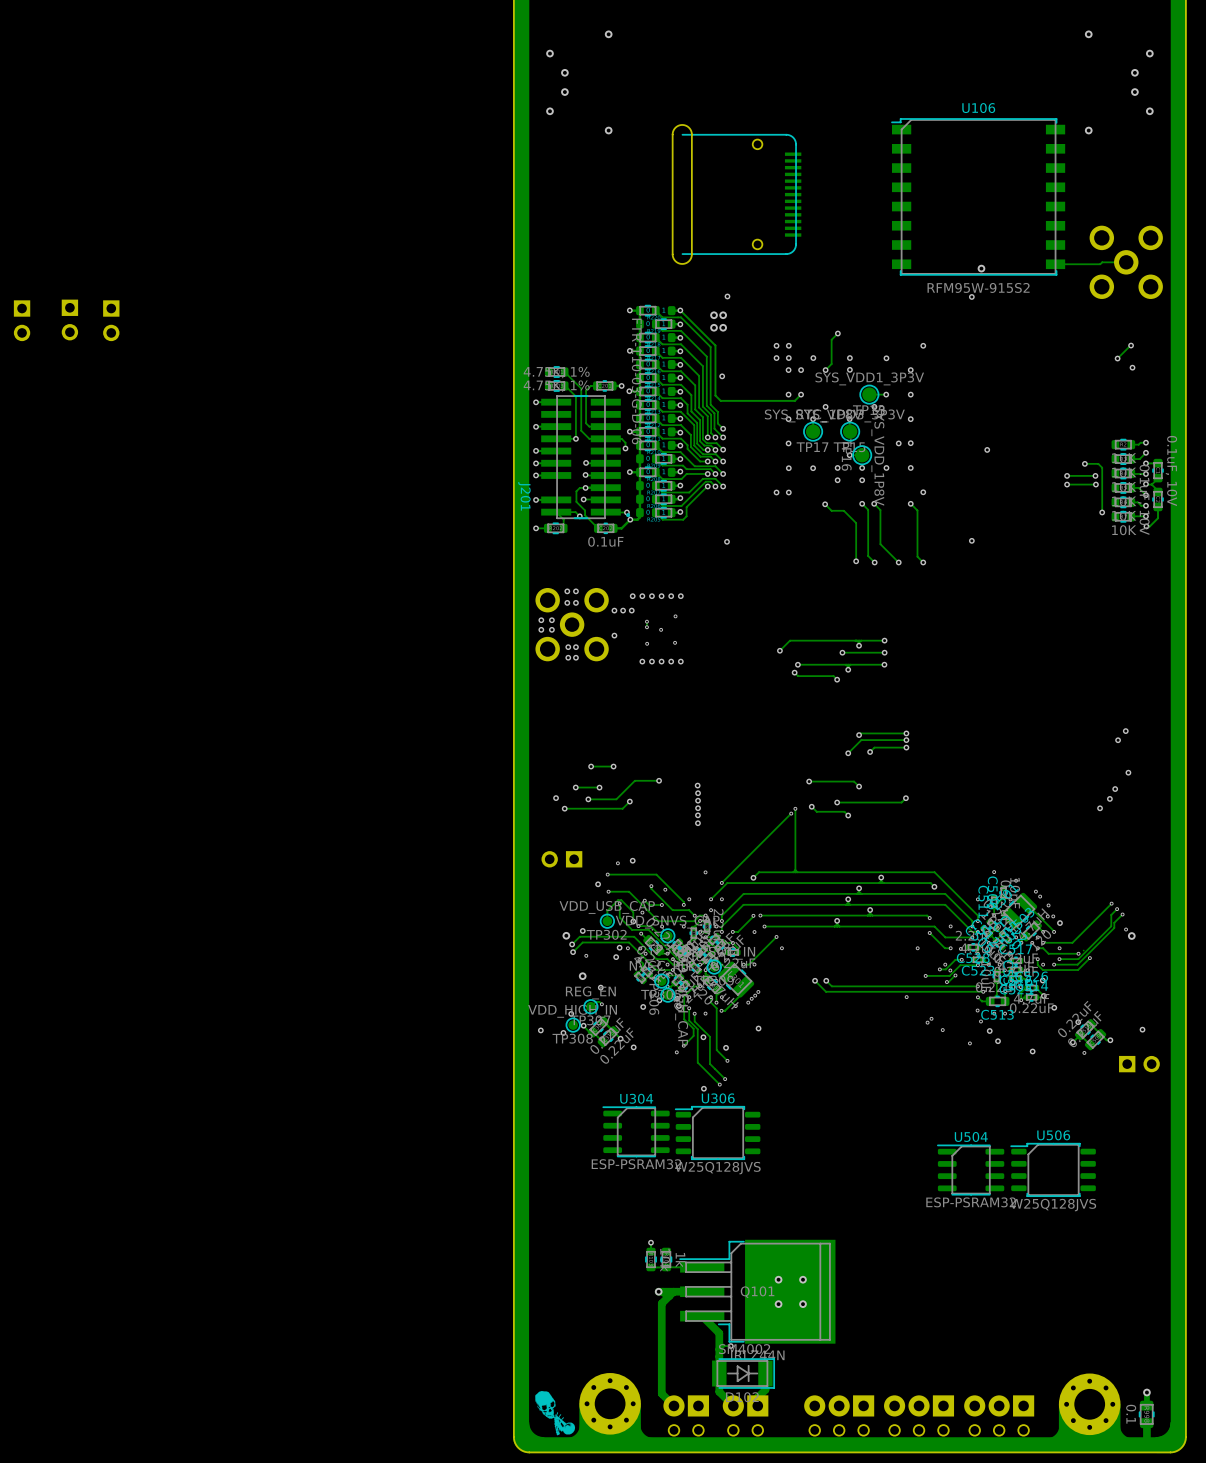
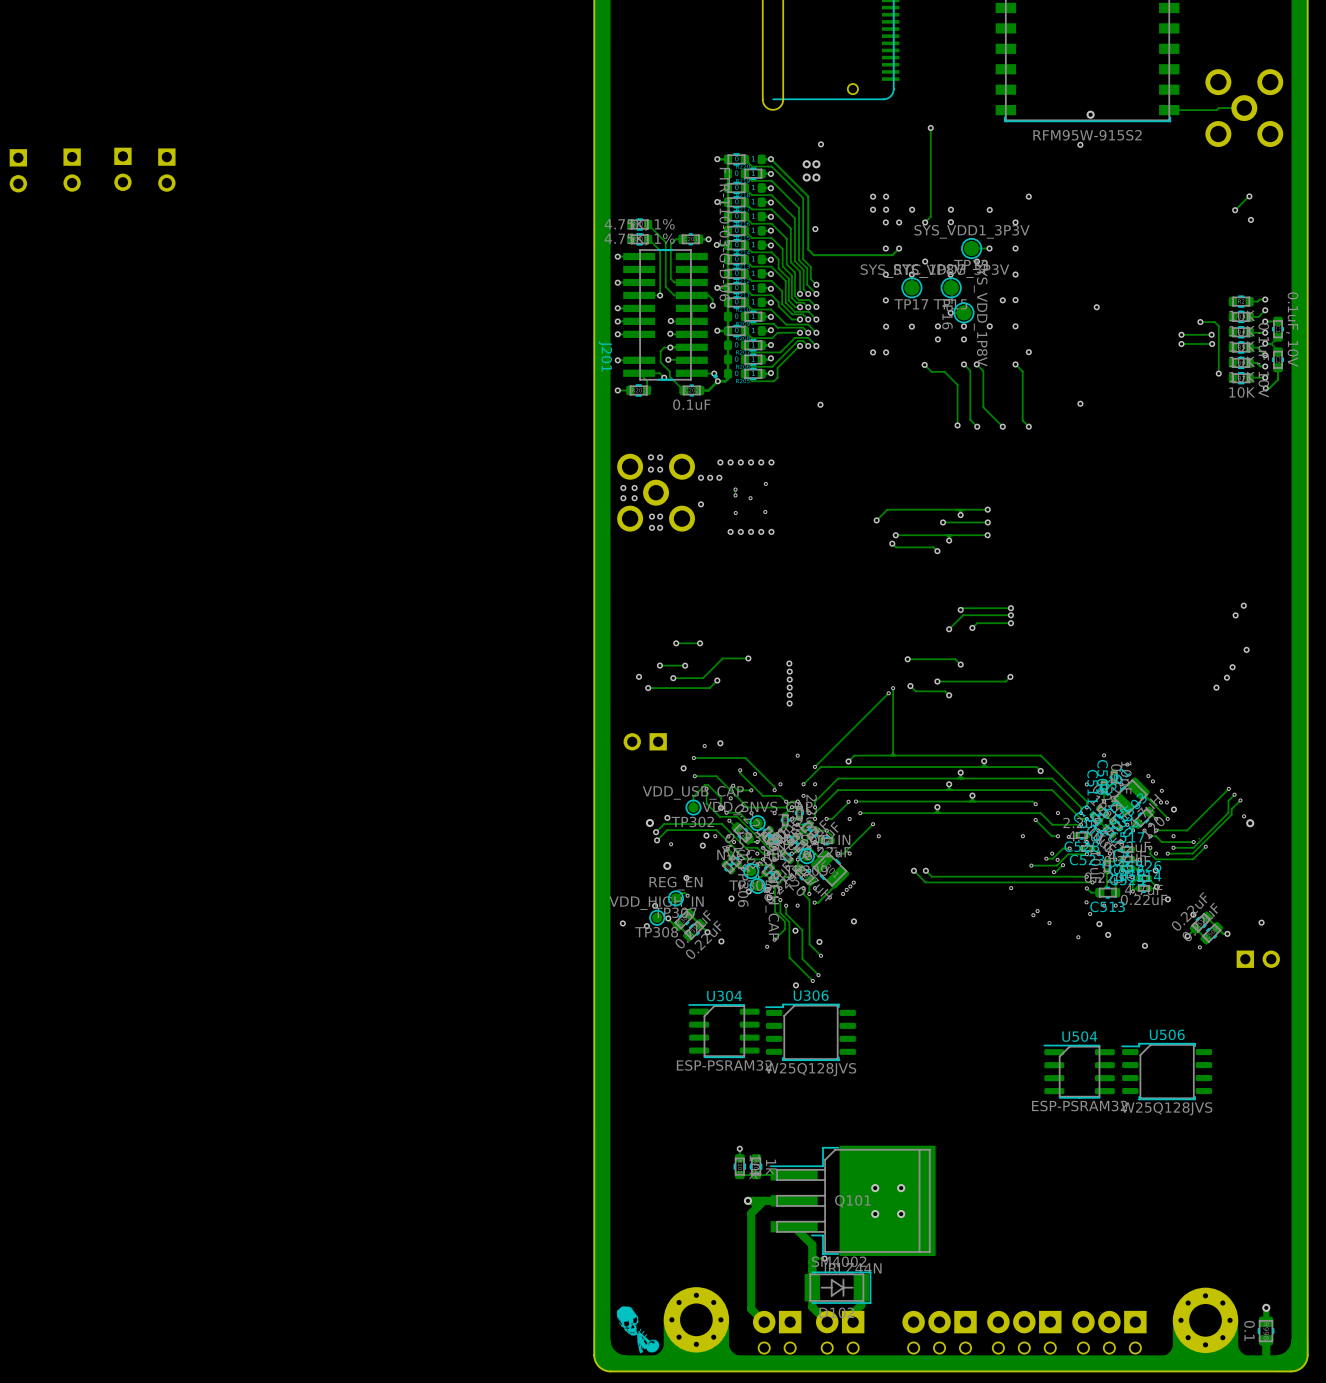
track: (837, 333) (831, 339) (830, 364) -> (930, 127) (930, 216)
via position: (837, 333) -> (930, 127)

